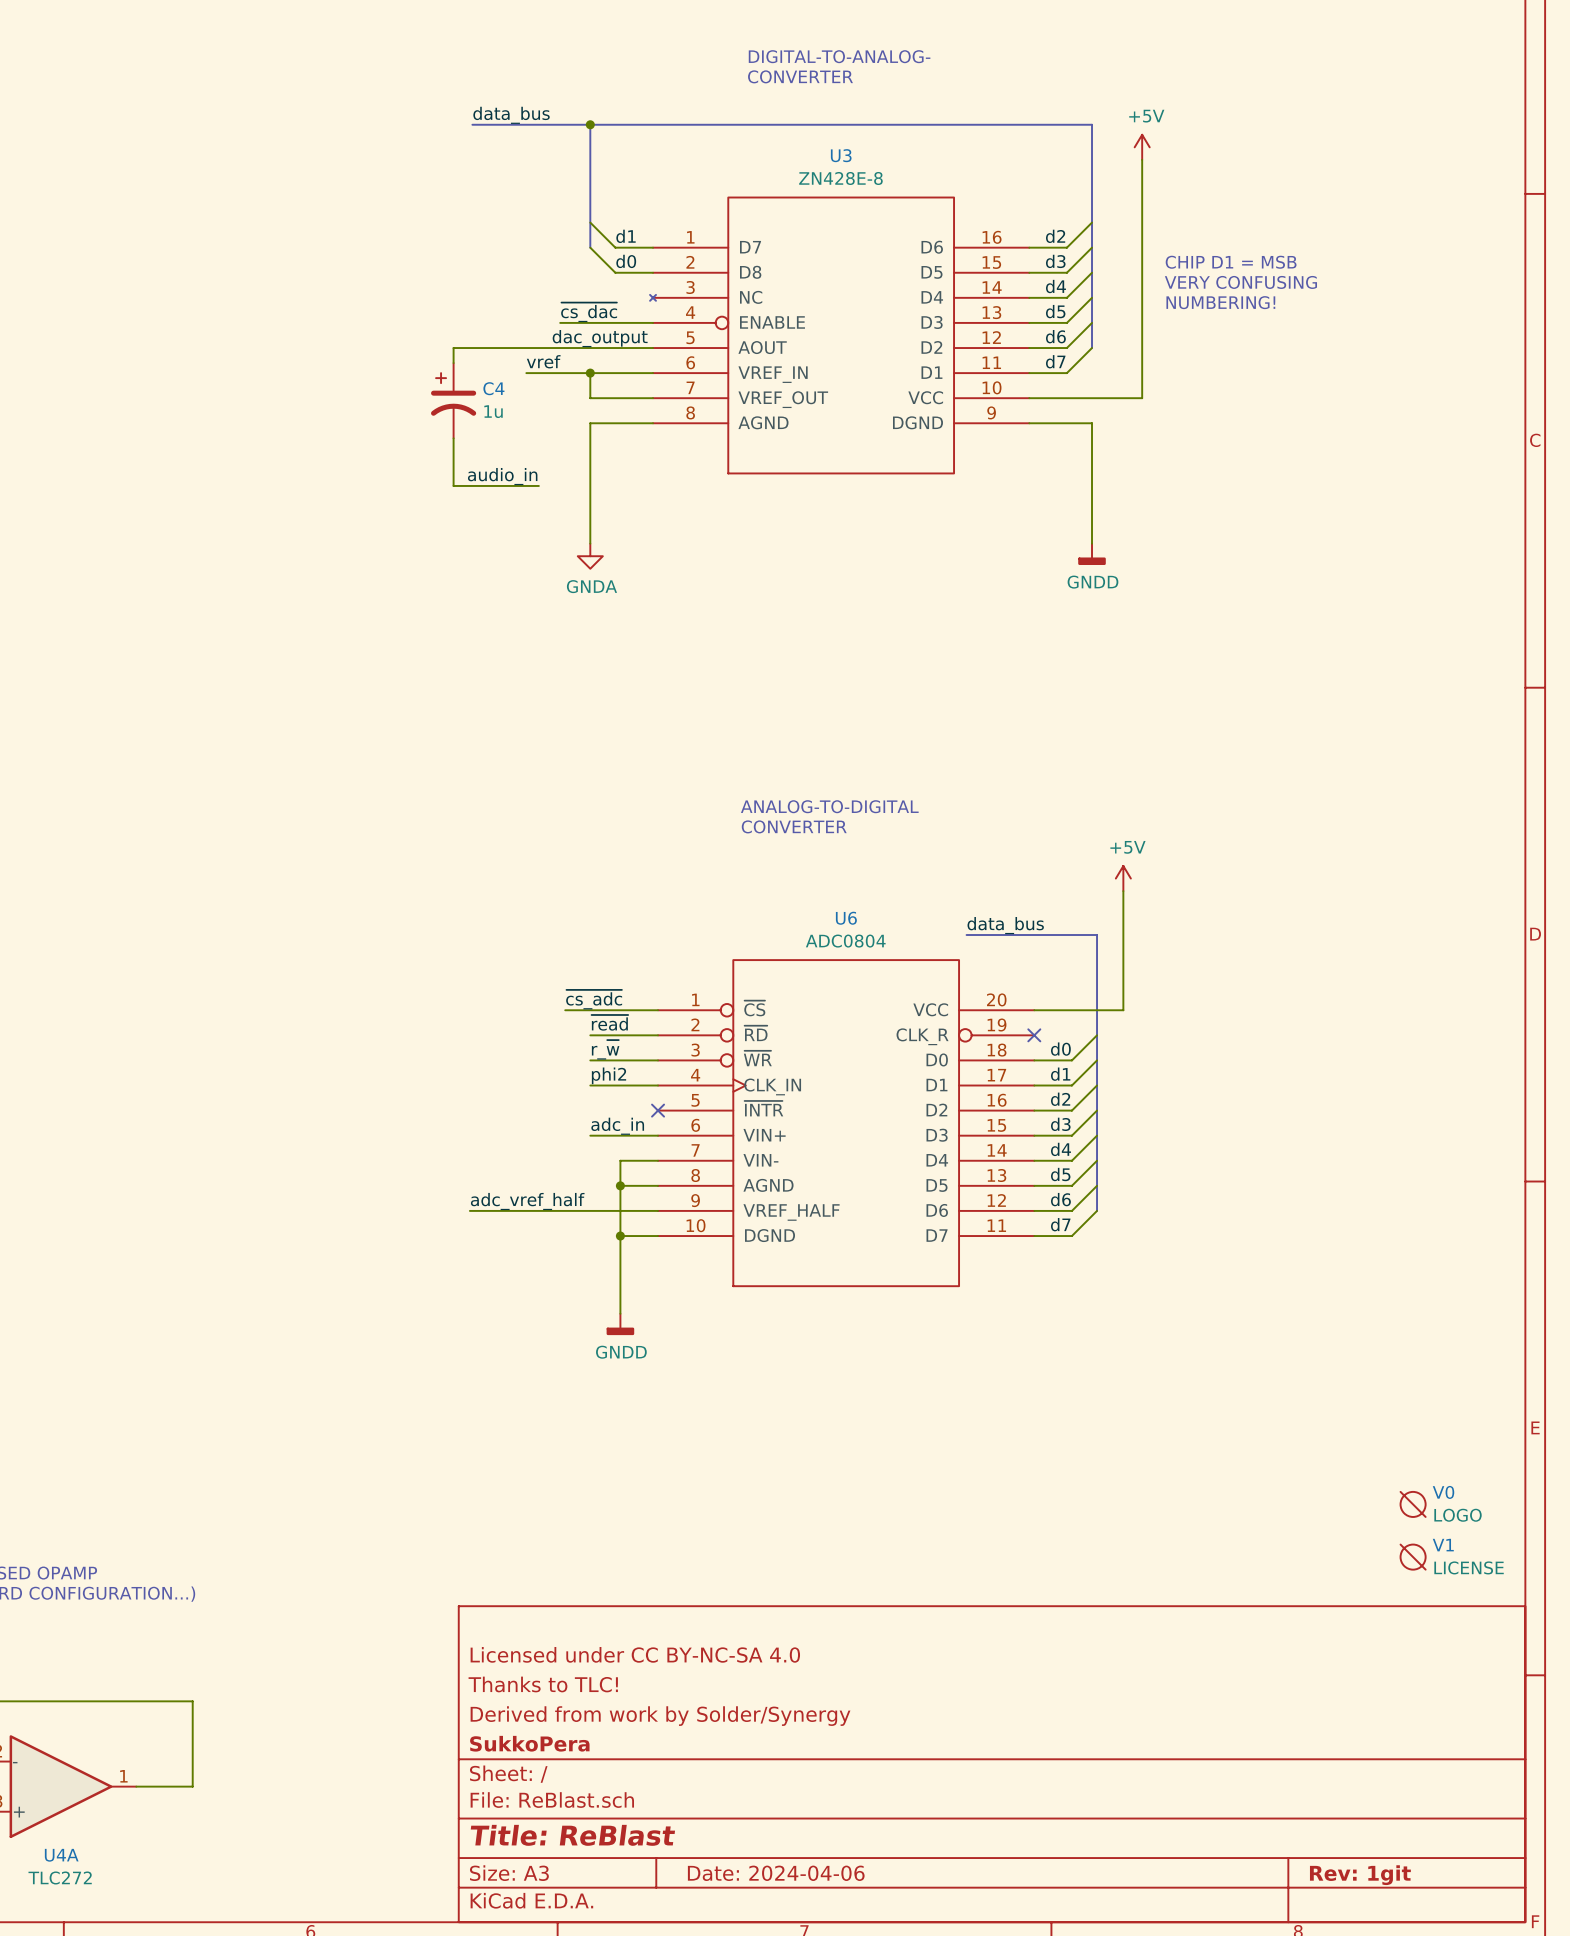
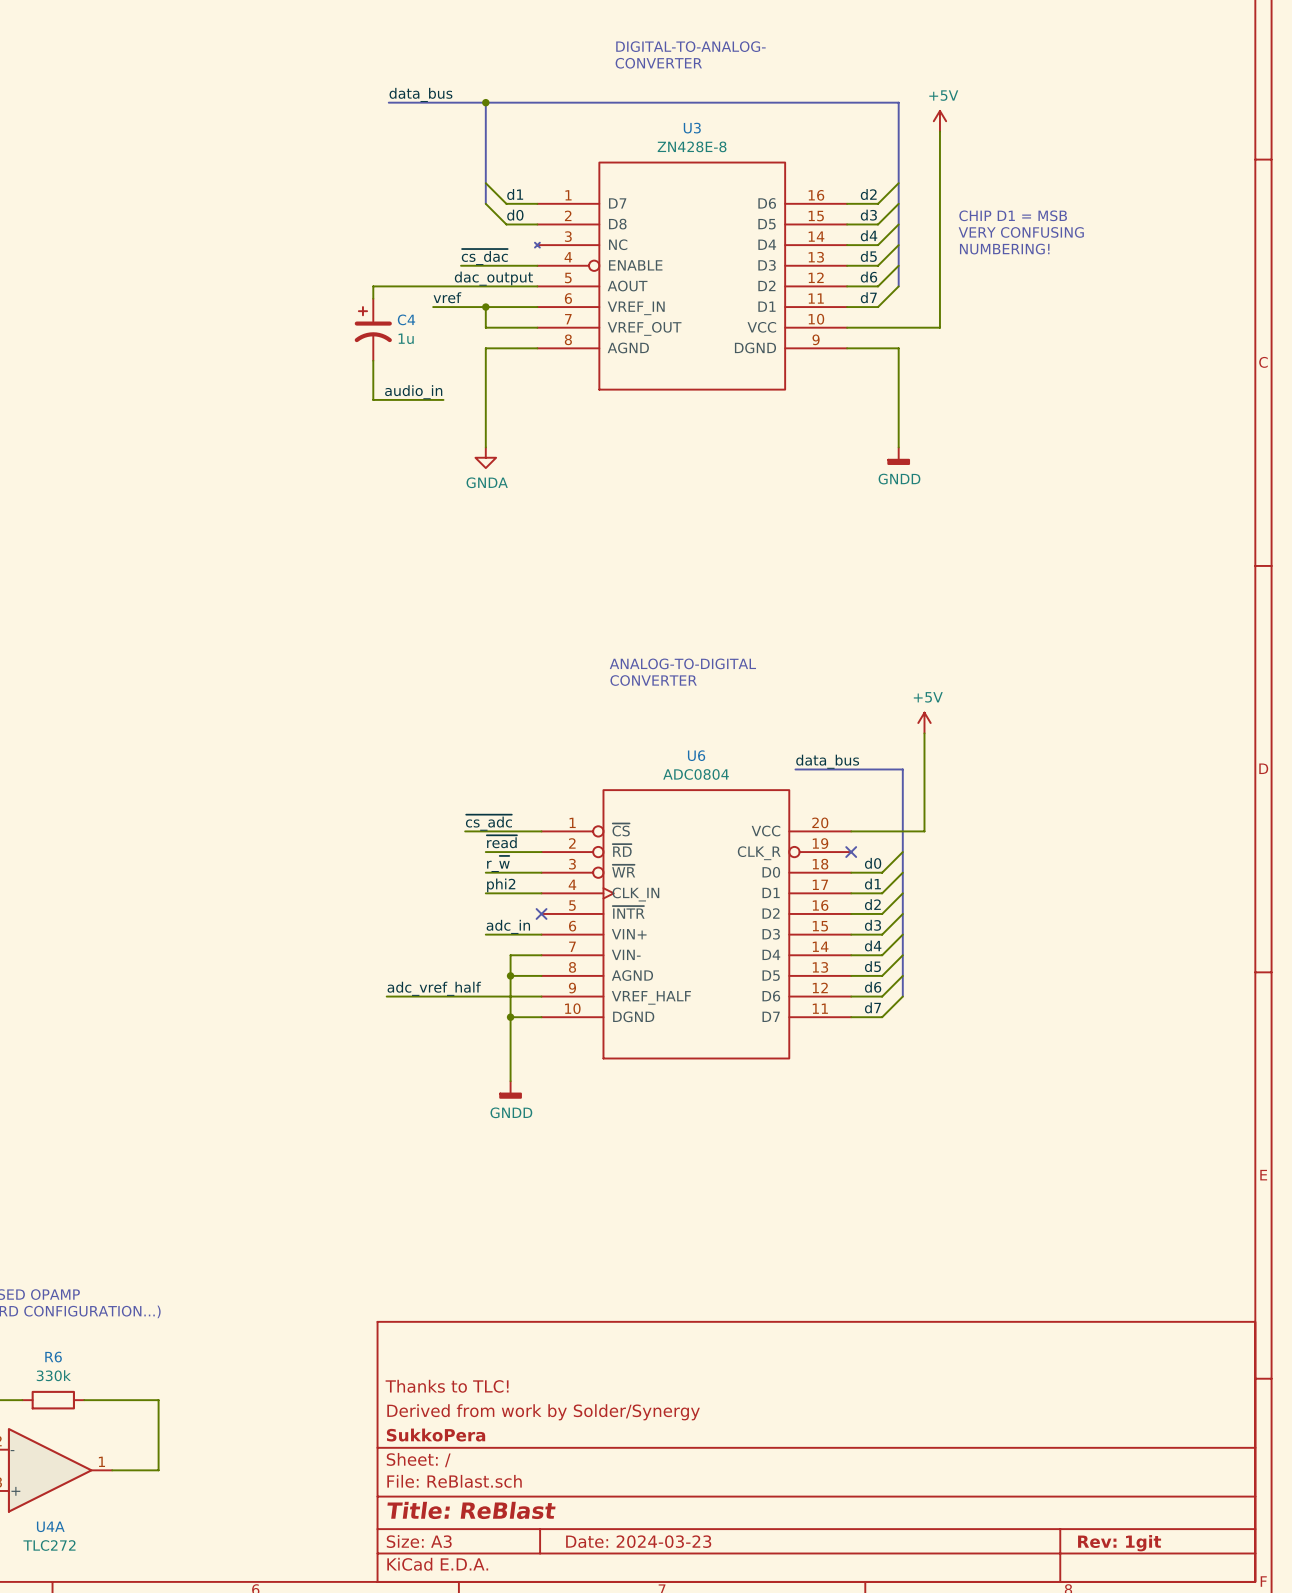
V0: LOGO (1413, 1504) -> none
V1: LICENSE (1413, 1557) -> none
title block: Licensed under CC BY-NC-SA 4.0 (635, 1654) -> none
wire: (27, 1701) (102, 1701) -> none
R6: none -> 330k (53, 1400)
title block: Date: 2024-04-06 (776, 1873) -> Date: 2024-03-23 (638, 1541)

